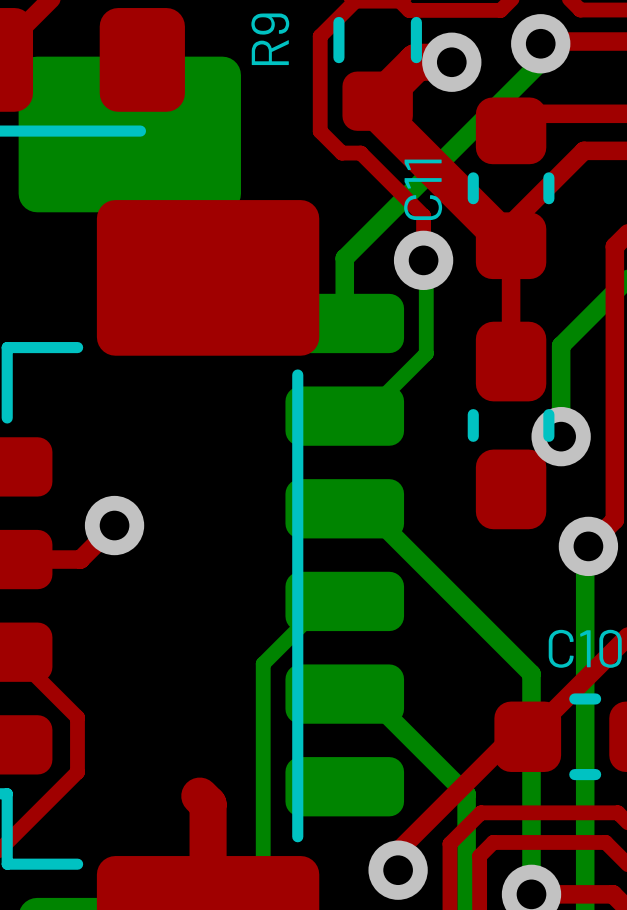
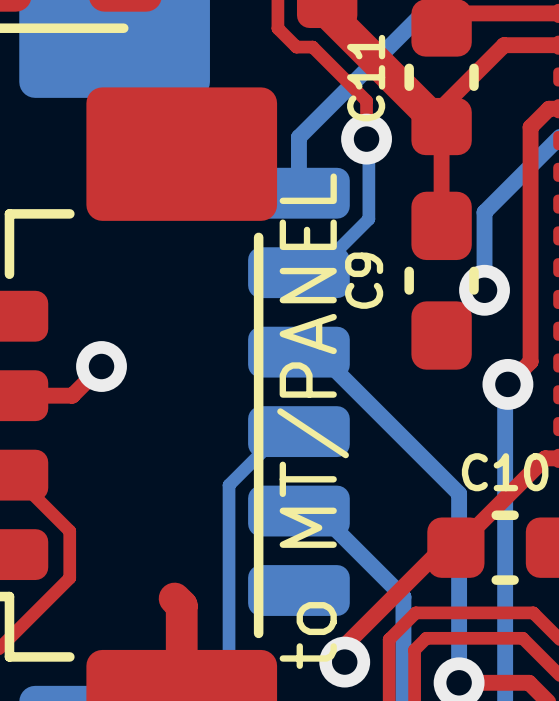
C9 name: none -> C9 (364, 280)
text: none -> to MT/PANEL (313, 421)

